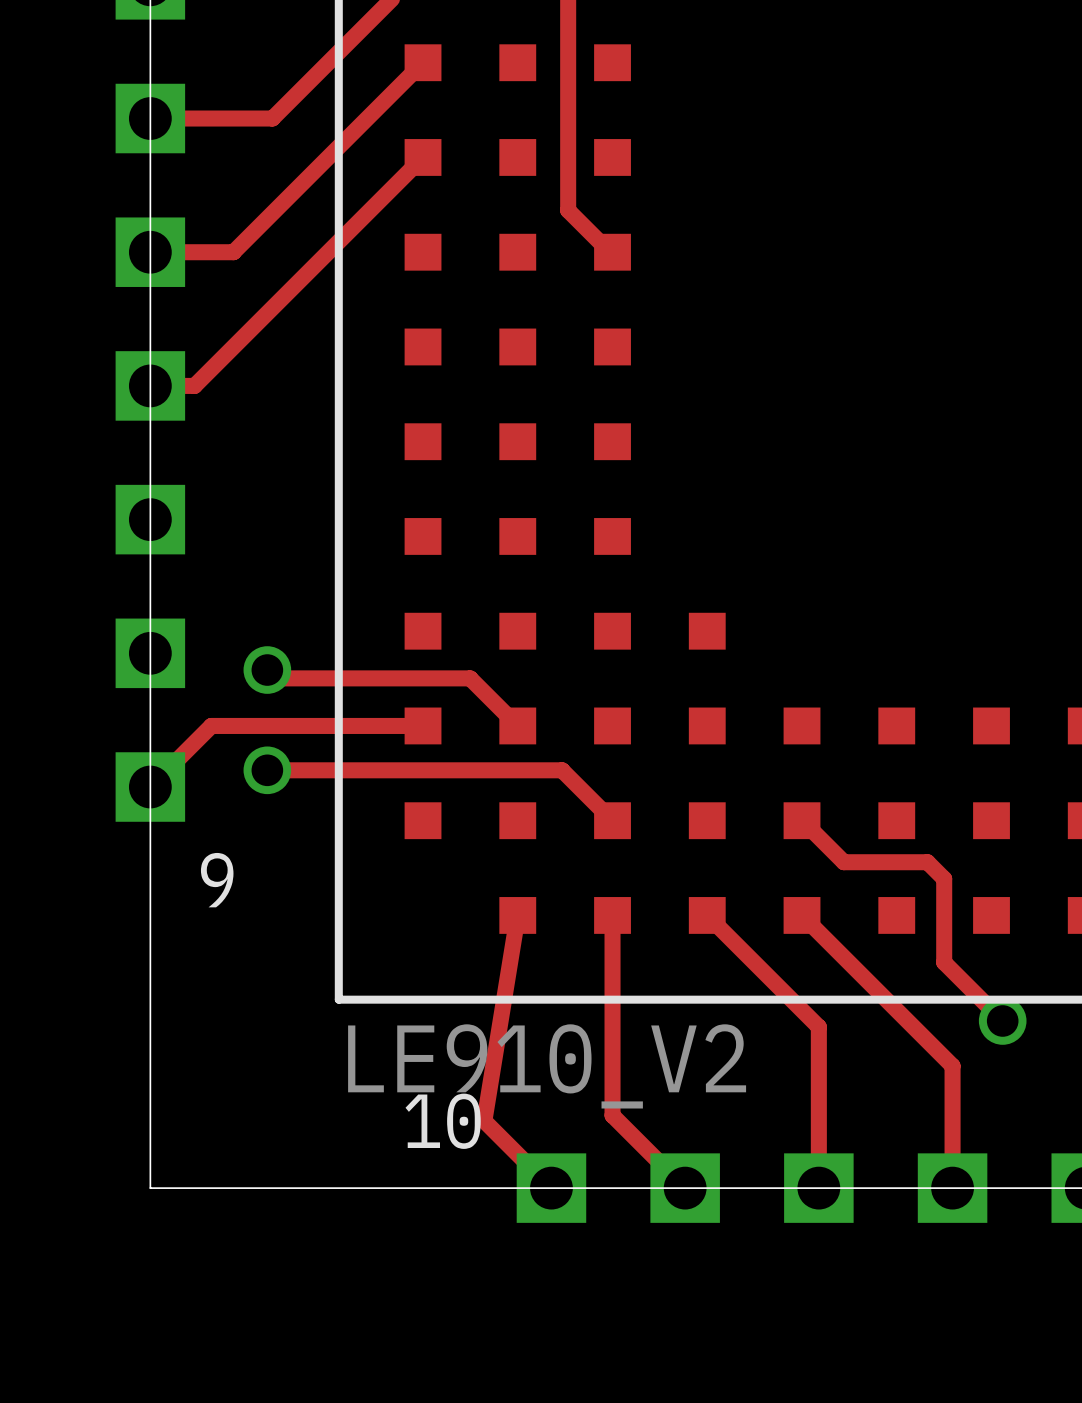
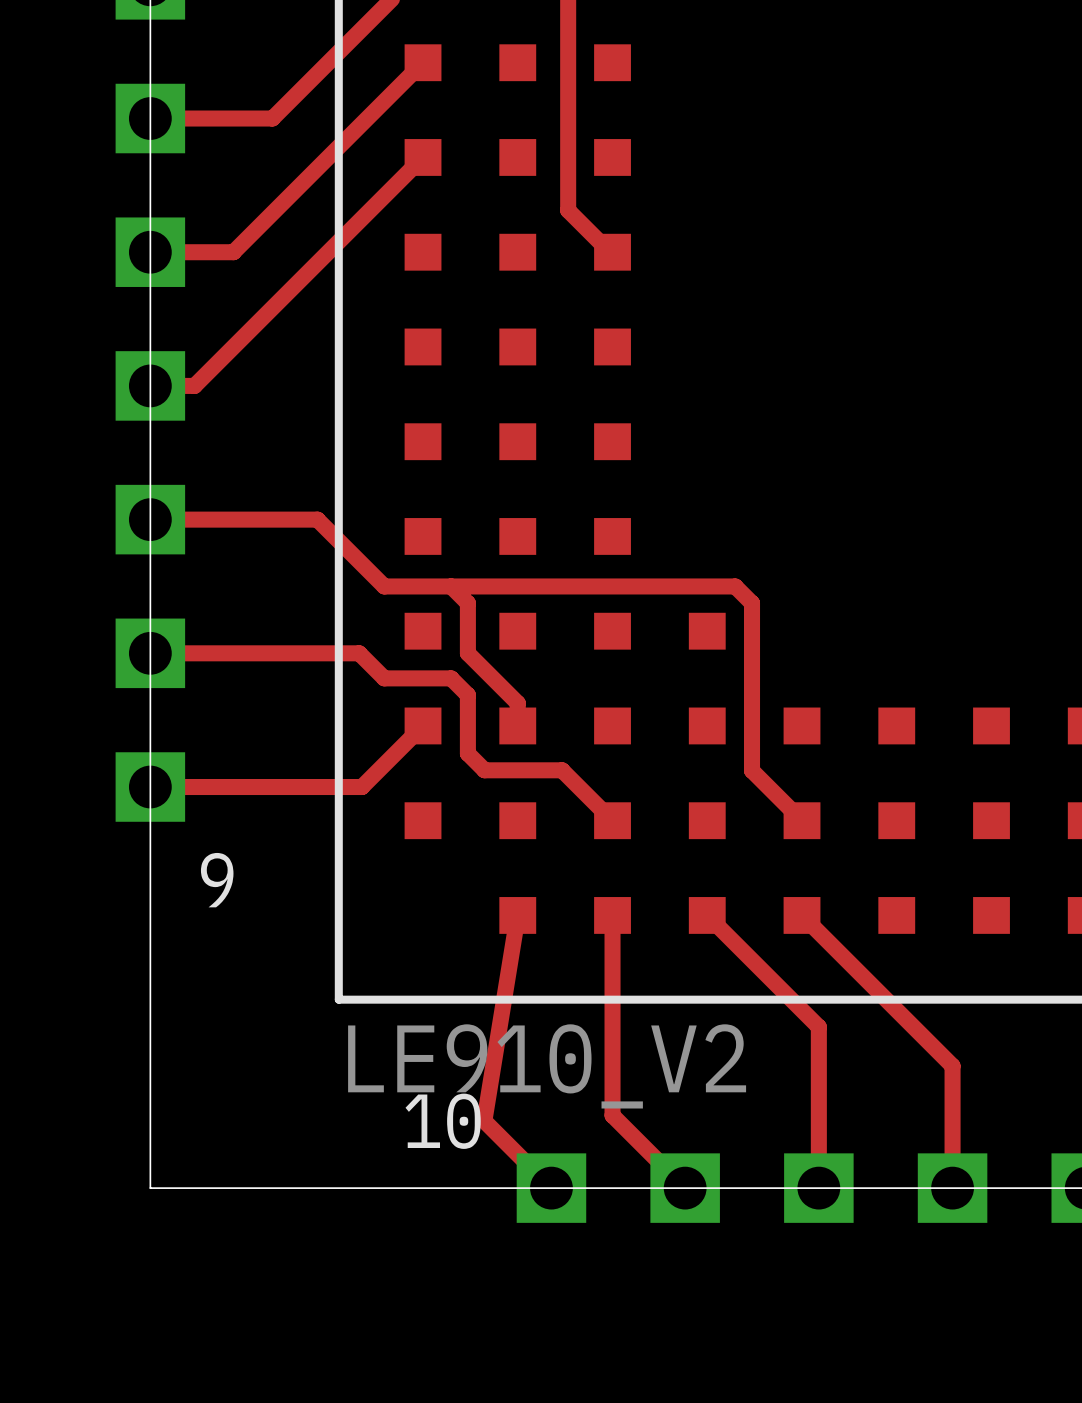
track: none -> (451, 586) (467, 603) (467, 653) (517, 703) (517, 725)
track: (267, 670) (275, 678) (384, 678) -> (150, 653) (359, 653) (384, 678)
via: (267, 670) -> none
track: (451, 678) (470, 678) (517, 725) -> (451, 678) (467, 695) (467, 753) (484, 770)
track: (423, 725) (211, 725) (150, 787) -> (423, 725) (361, 787) (150, 787)
track: (267, 770) (484, 770) -> none
via: (267, 770) -> none
track: (802, 820) (843, 862) (927, 862) (944, 878) (944, 962) (1002, 1020) -> (802, 820) (752, 770) (752, 603) (735, 586) (384, 586) (317, 519) (150, 519)
via: (1002, 1020) -> none

